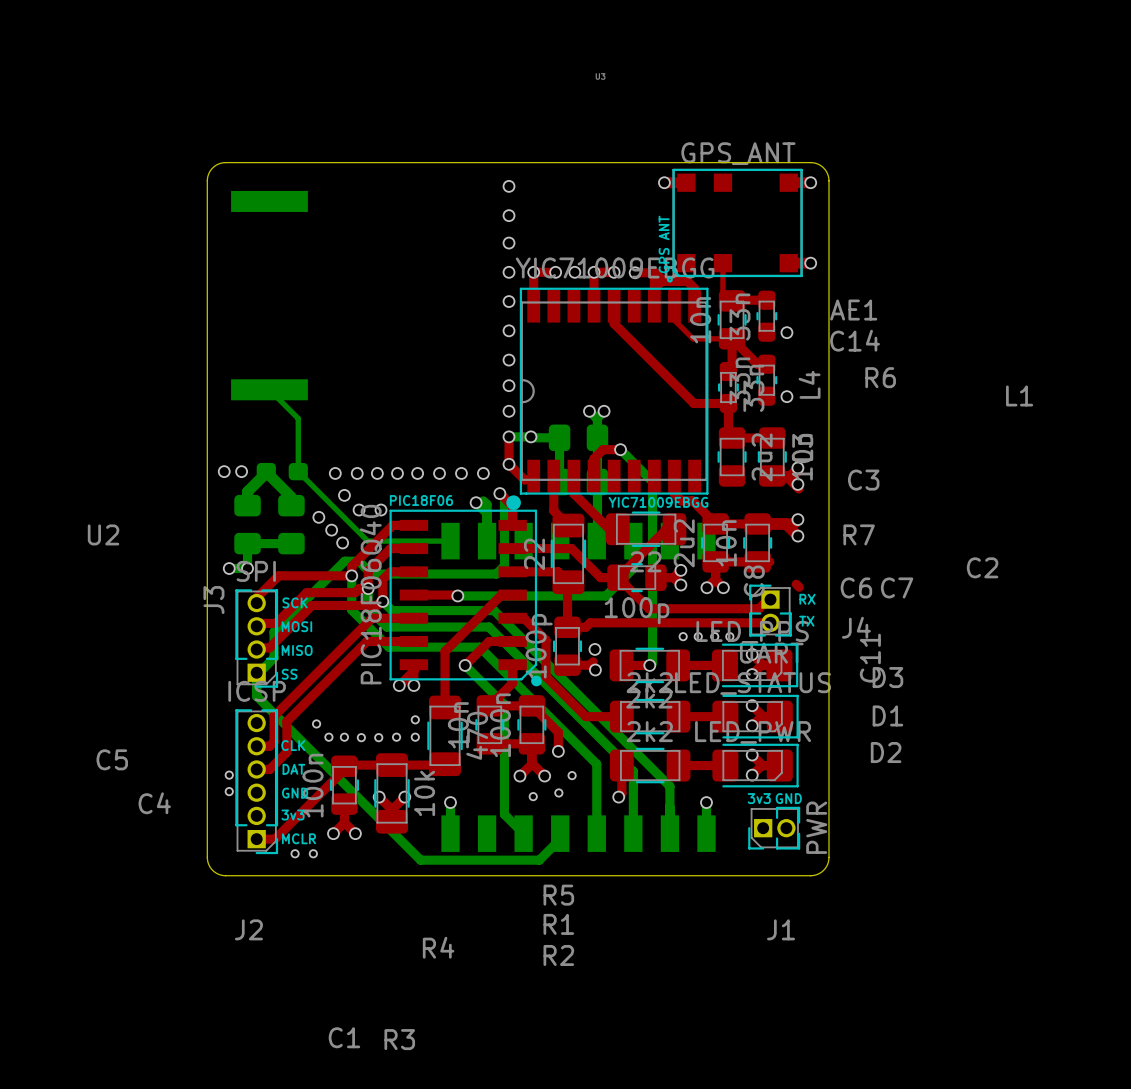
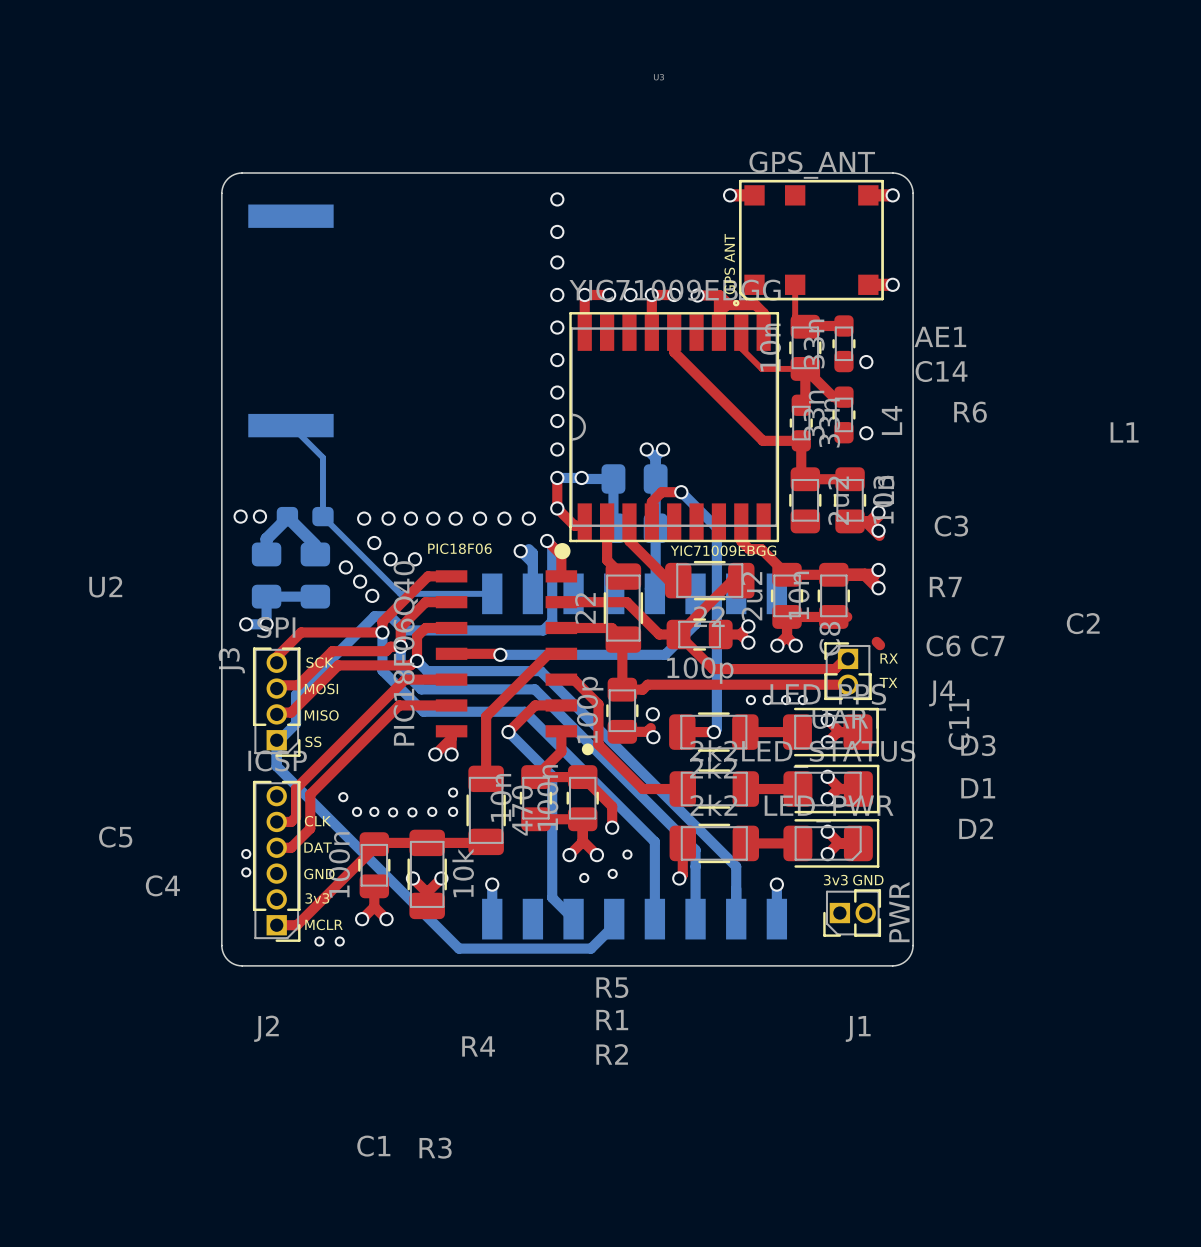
U2 footprint: [389, 509, 542, 687] -> [435, 570, 594, 756]

